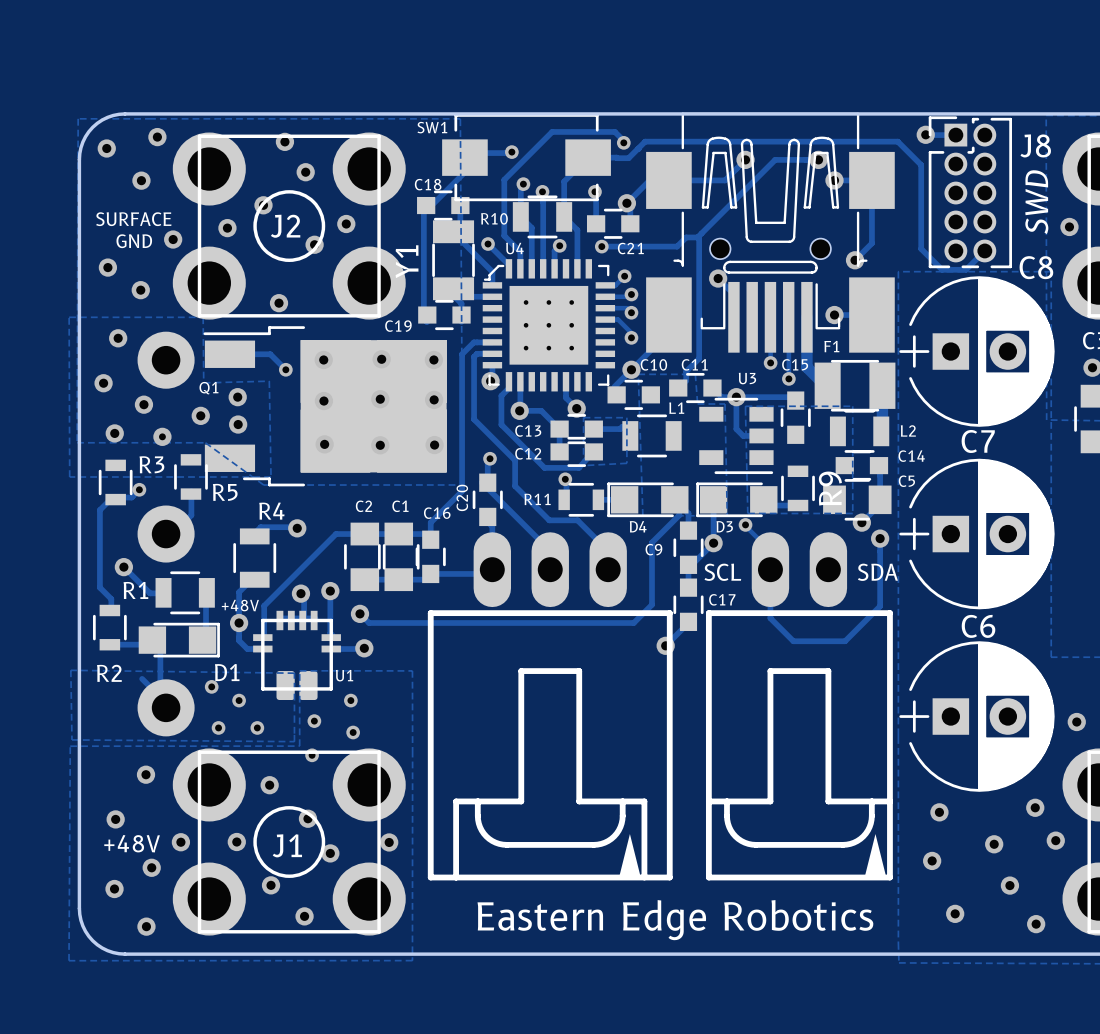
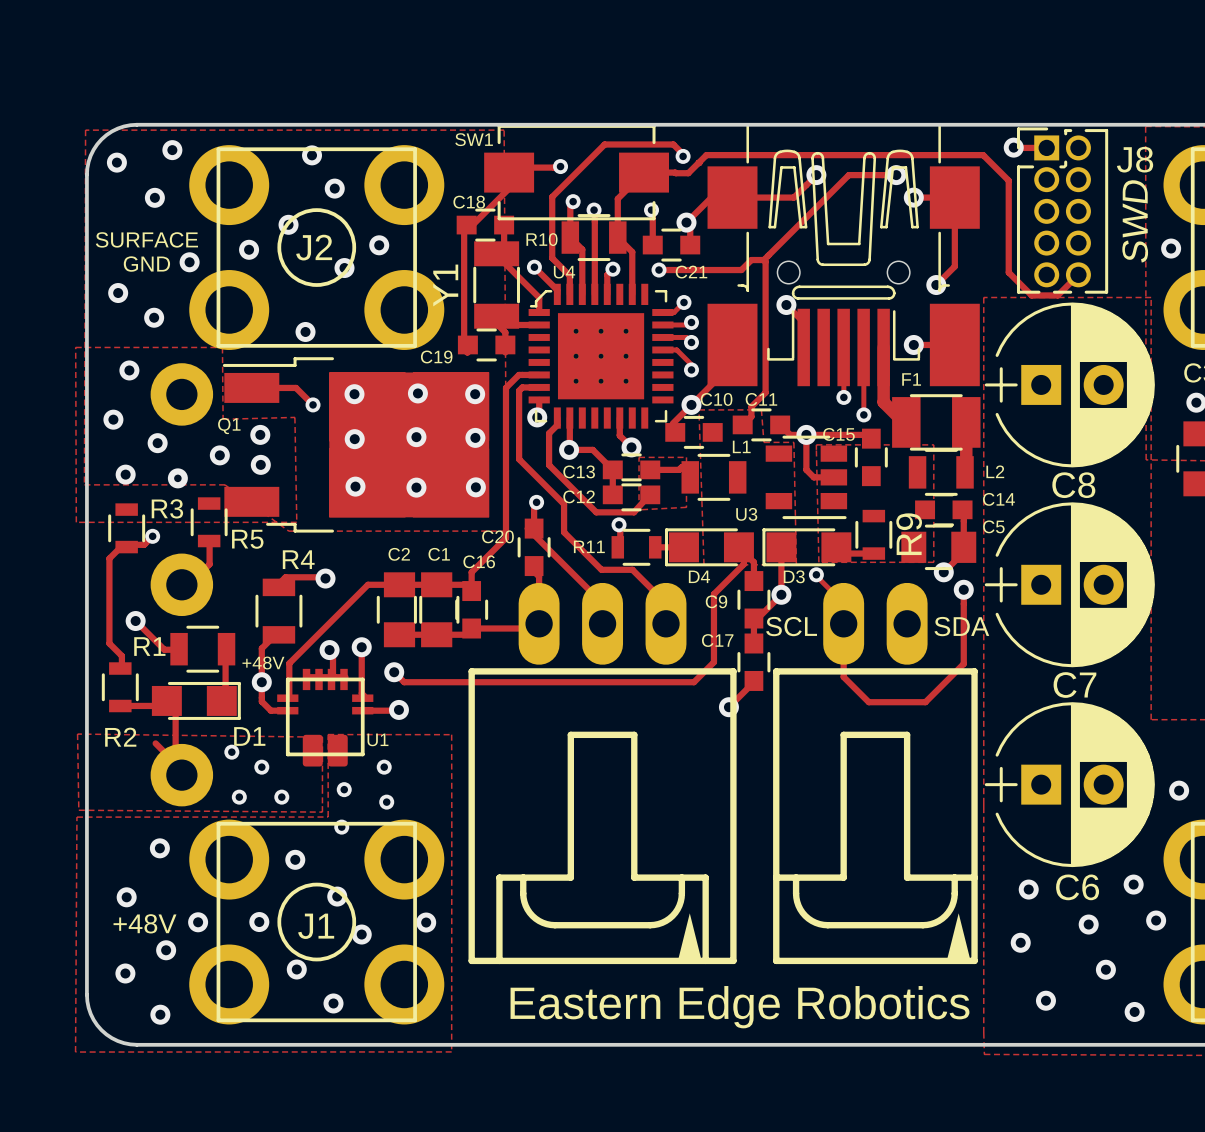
C8 name position: C8 (1036, 267) -> C8 (1073, 485)
C15 name position: C15 (795, 364) -> C15 (838, 434)
U3 name position: U3 (747, 378) -> U3 (746, 514)
C7 name position: C7 (978, 441) -> C7 (1074, 685)
C20 name rotation: 0° (462, 497) -> 90° clockwise (497, 536)
C17 name position: C17 (722, 599) -> C17 (717, 640)
C6 name position: C6 (978, 626) -> C6 (1077, 887)

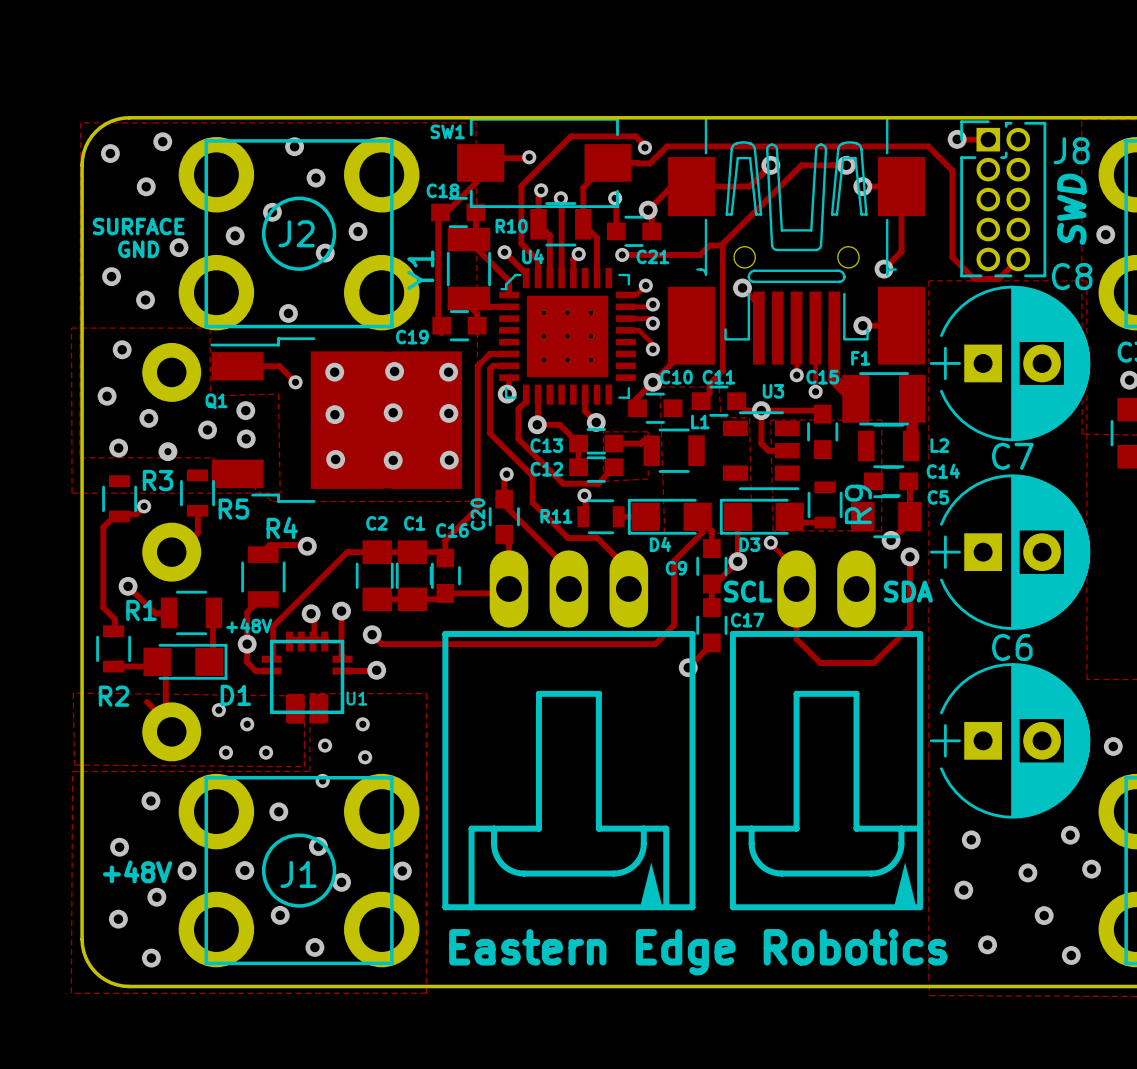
C15 name position: C15 (838, 434) -> C15 (822, 377)
C8 name position: C8 (1073, 485) -> C8 (1072, 276)
U3 name position: U3 (746, 514) -> U3 (773, 391)
C20 name rotation: 0° (497, 536) -> 90° counterclockwise (477, 514)
C17 name position: C17 (717, 640) -> C17 (747, 620)
C7 name position: C7 (1074, 685) -> C7 (1012, 456)
C6 name position: C6 (1077, 887) -> C6 (1012, 647)

